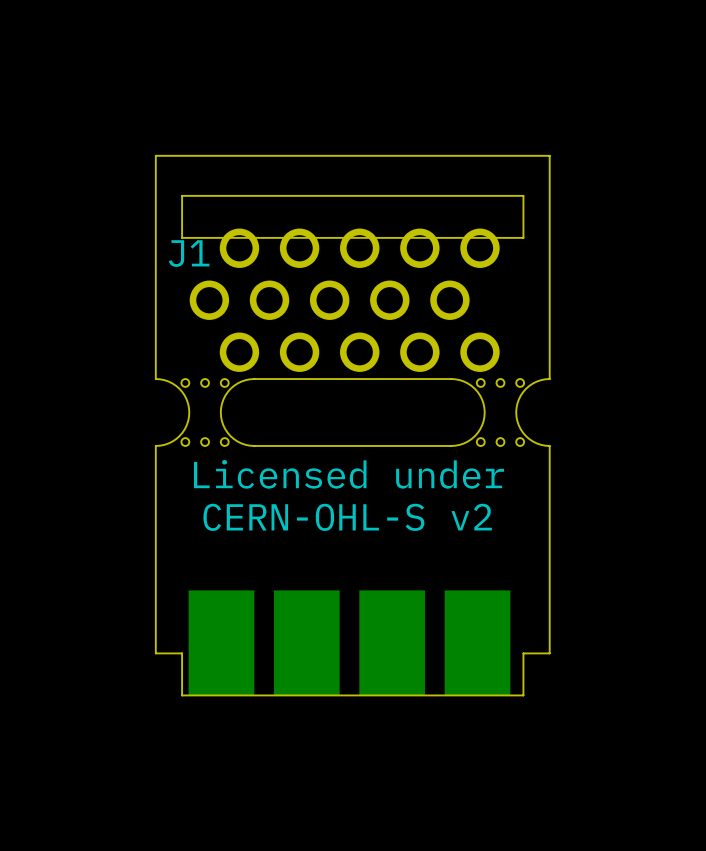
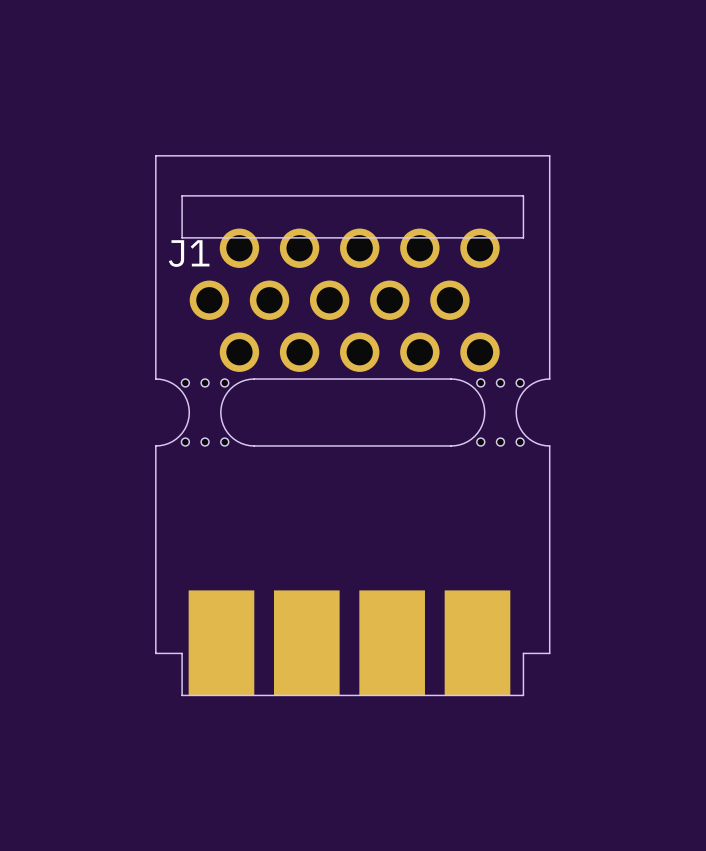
text: Licensed under (349, 474) -> none
text: CERN-OHL-S v2 (347, 517) -> none

